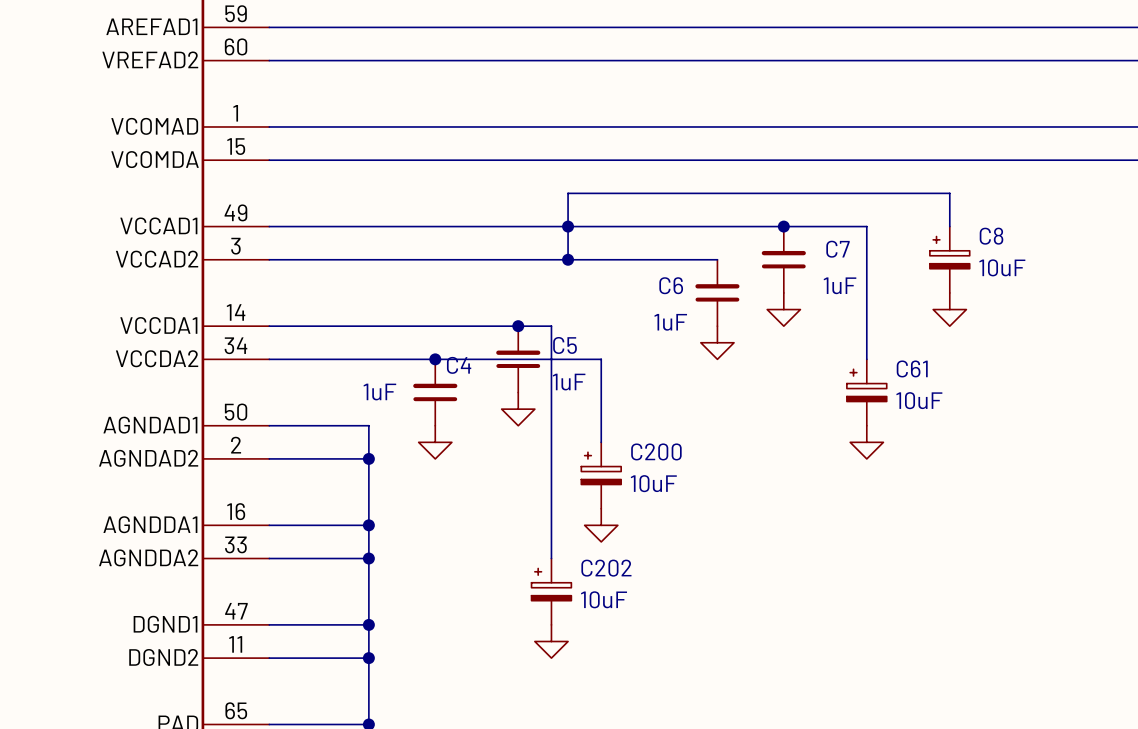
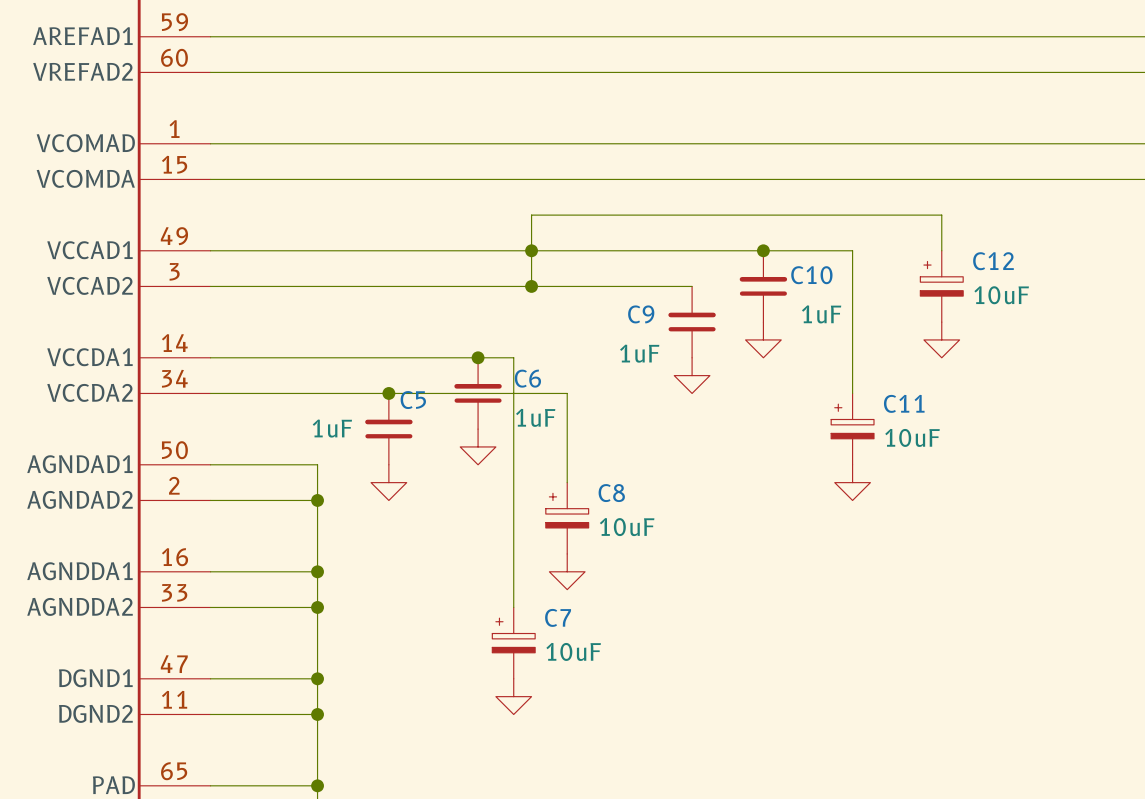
C8 name: C8 (991, 236) -> C12 (993, 261)
C7 name: C7 (838, 249) -> C10 (811, 275)
C6 name: C6 (671, 285) -> C9 (641, 314)
C5 name: C5 (565, 345) -> C6 (527, 378)
C4 name: C4 (459, 365) -> C5 (413, 400)
C61 name: C61 (912, 368) -> C11 (904, 403)
C200 name: C200 (656, 451) -> C8 (611, 493)
C202 name: C202 (606, 568) -> C7 (558, 617)

